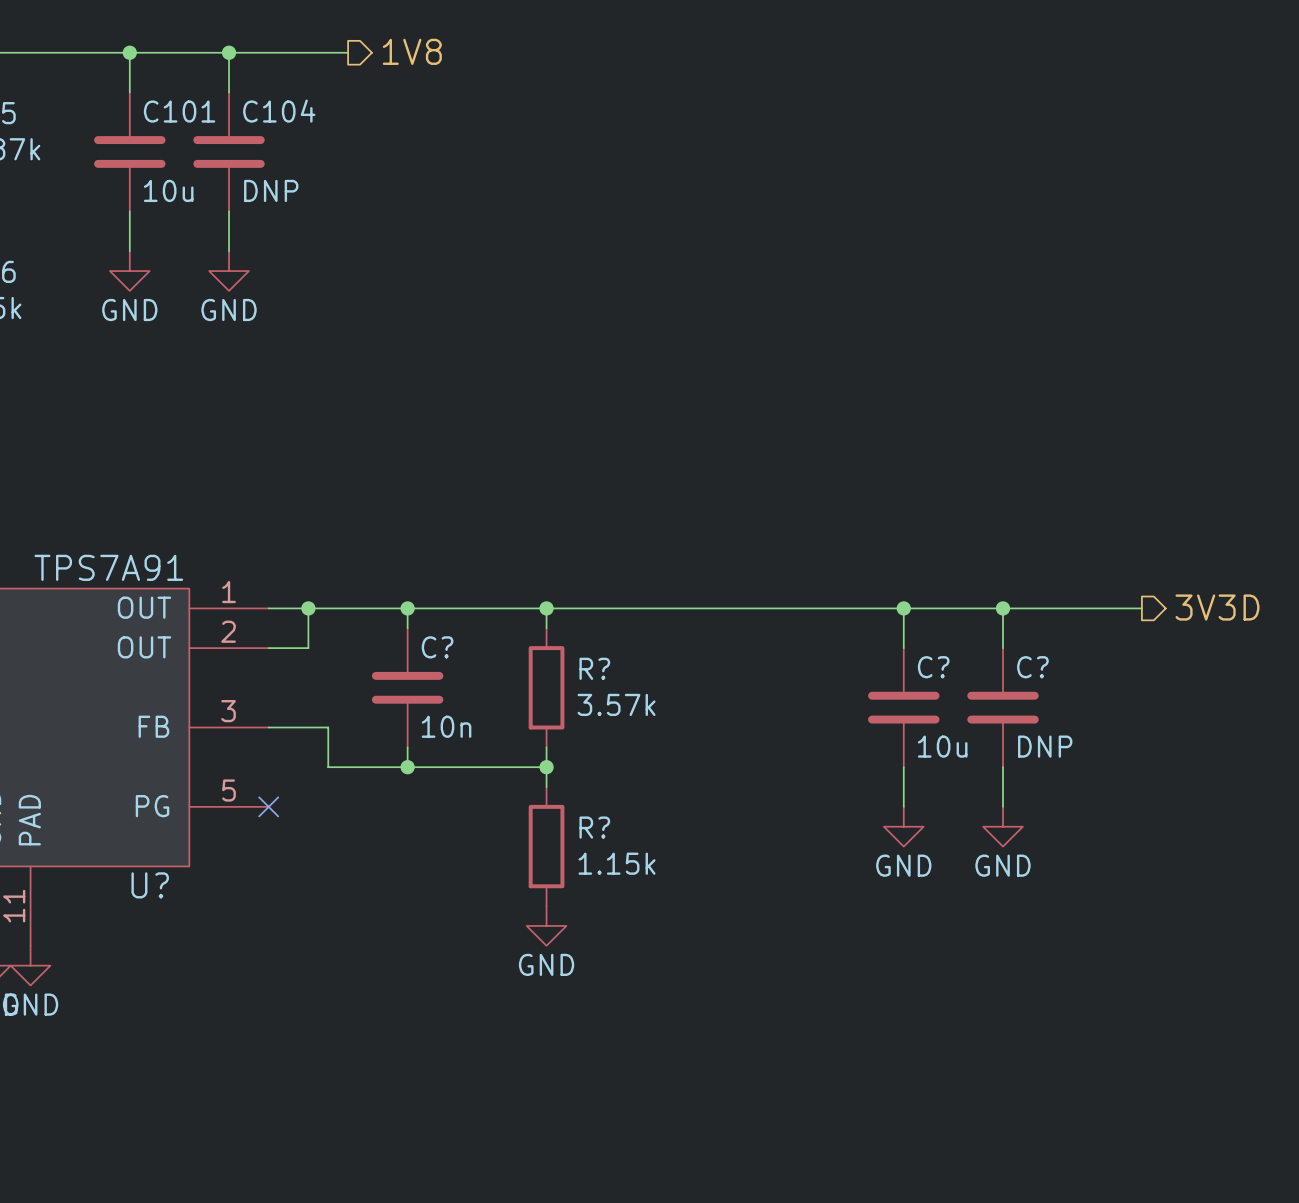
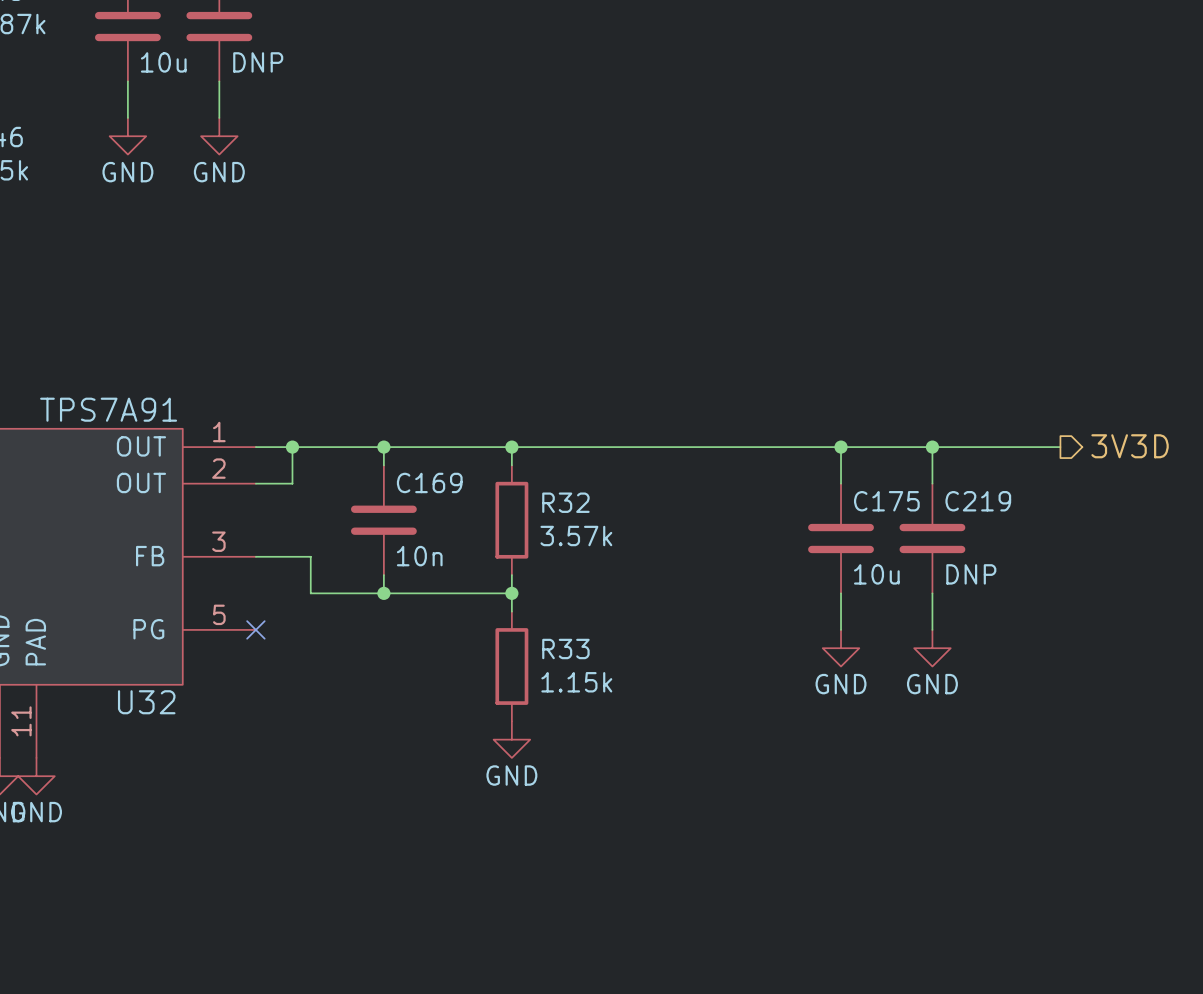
C? name: C? (437, 647) -> C169 (429, 482)
C? name: C? (933, 667) -> C175 (886, 501)
C? name: C? (1032, 667) -> C219 (978, 501)
R? name: R? (594, 668) -> R32 (565, 502)
R? name: R? (594, 827) -> R33 (565, 648)
U? name: U? (150, 885) -> U32 (146, 702)

